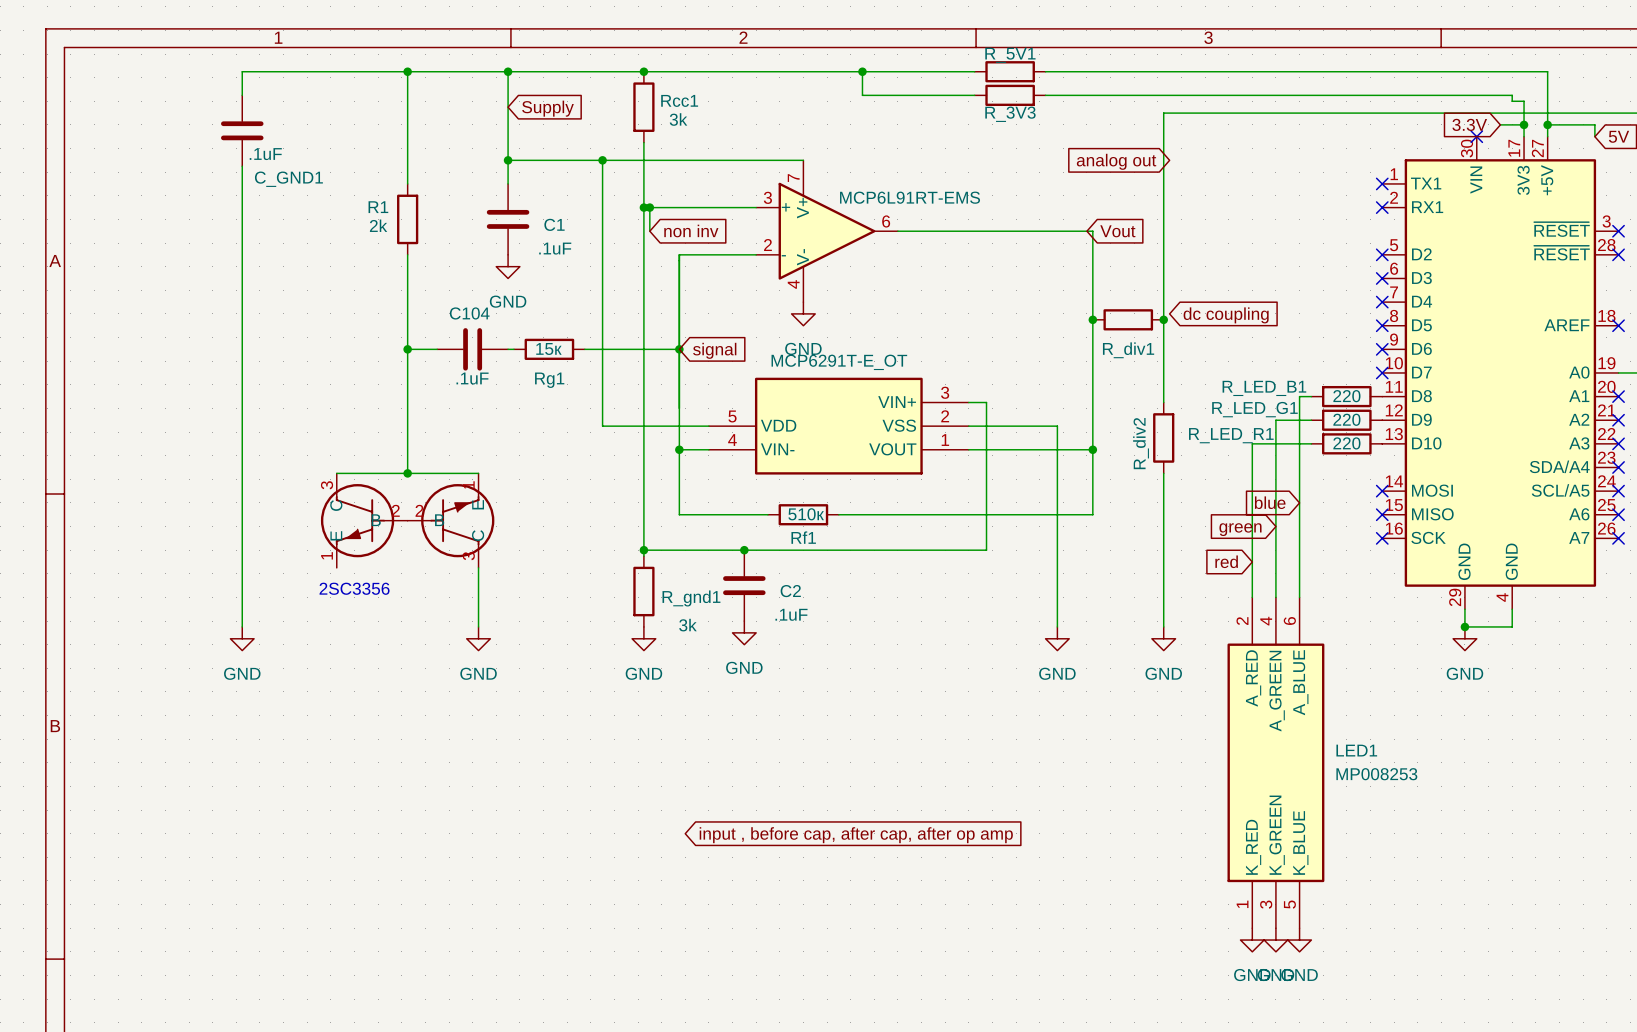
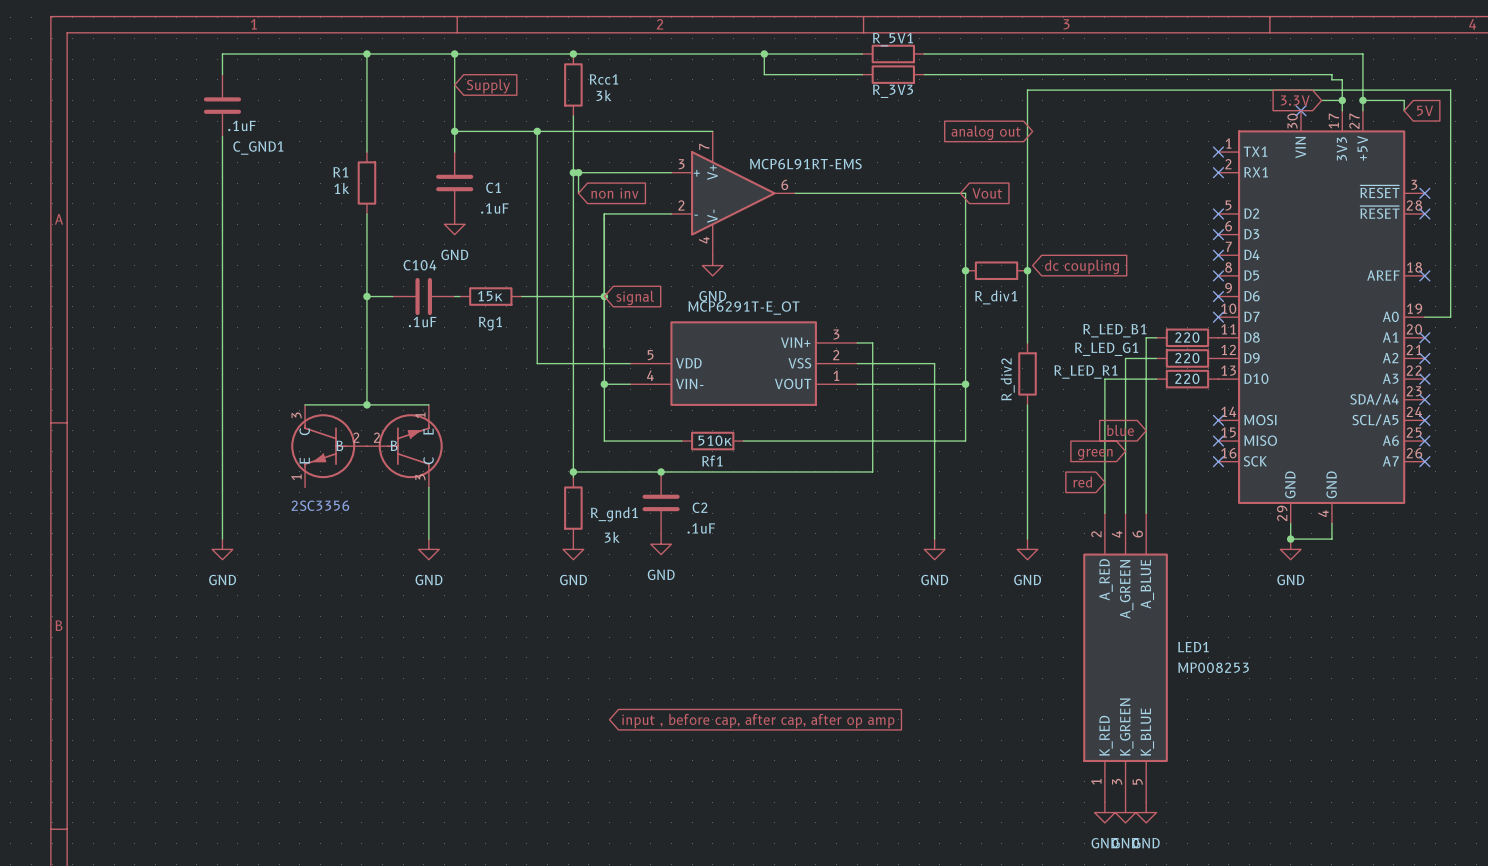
R1 value: 2k (378, 225) -> 1k (341, 188)

